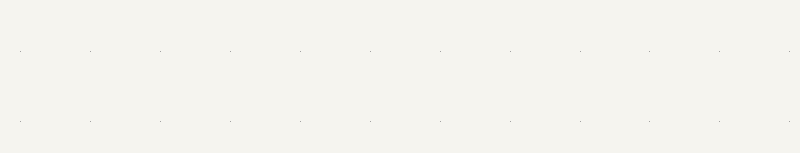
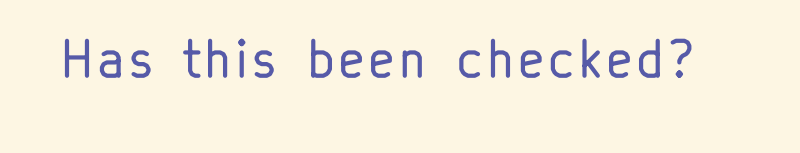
text: none -> Has this been checked? (378, 58)

